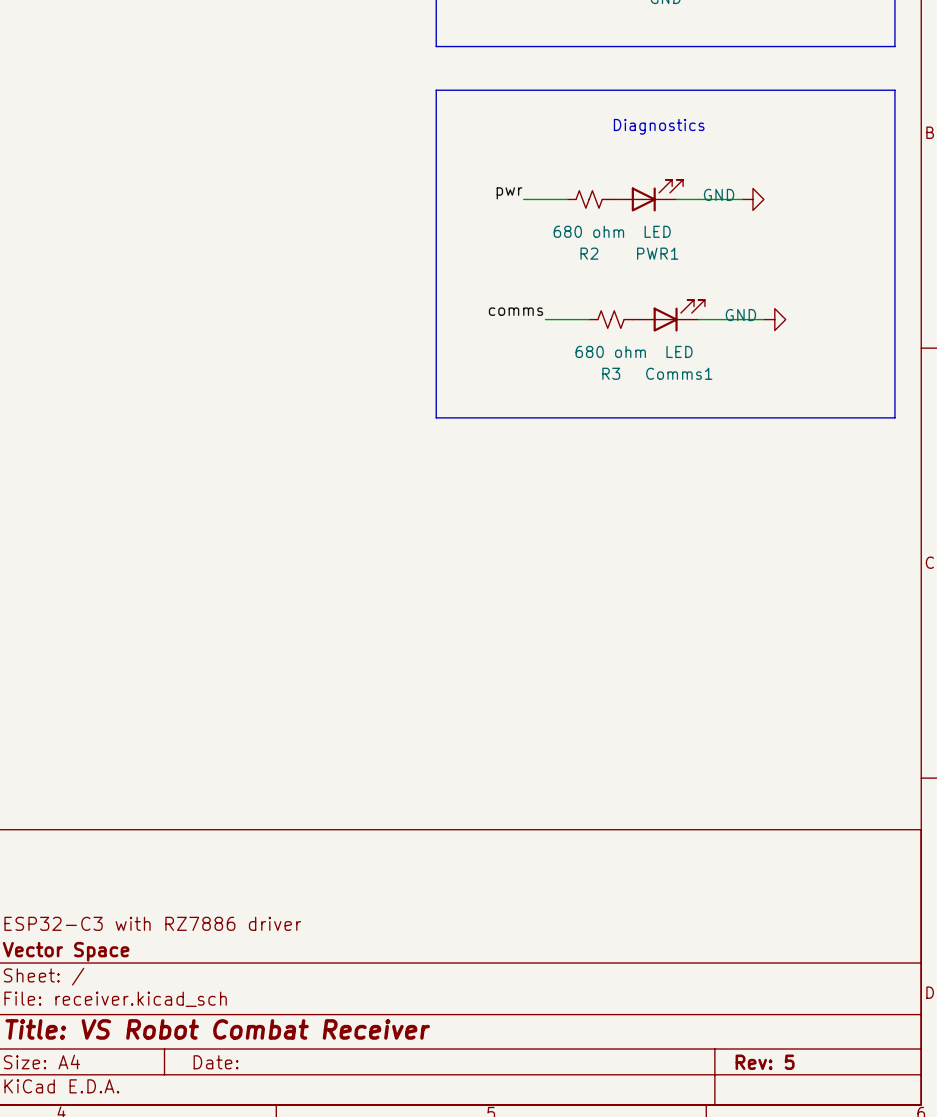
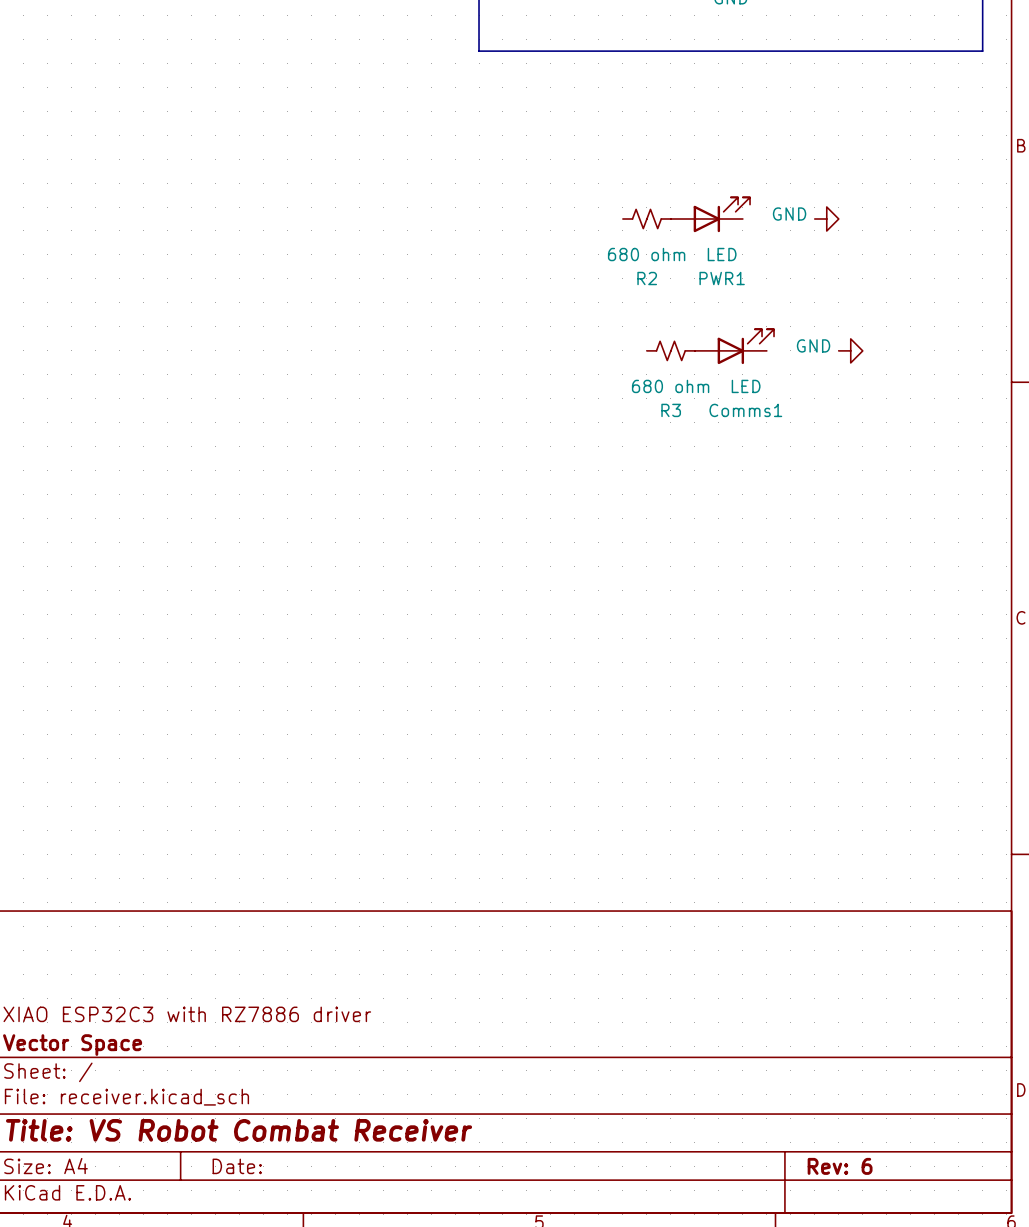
line: (436, 90) (436, 417) (894, 417) (894, 90) (436, 90) -> none
text: Diagnostics (659, 126) -> none
label: pwr (509, 193) -> none
wire: (523, 199) (567, 199) -> none
wire: (676, 199) (742, 199) -> none
label: comms (516, 311) -> none
wire: (545, 319) (589, 319) -> none
wire: (698, 319) (763, 319) -> none
title block: ESP32-C3 with RZ7886 driver (152, 923) -> XIAO ESP32C3 with RZ7886 driver (187, 1014)
title block: Rev: 5 (765, 1062) -> Rev: 6 (840, 1166)

